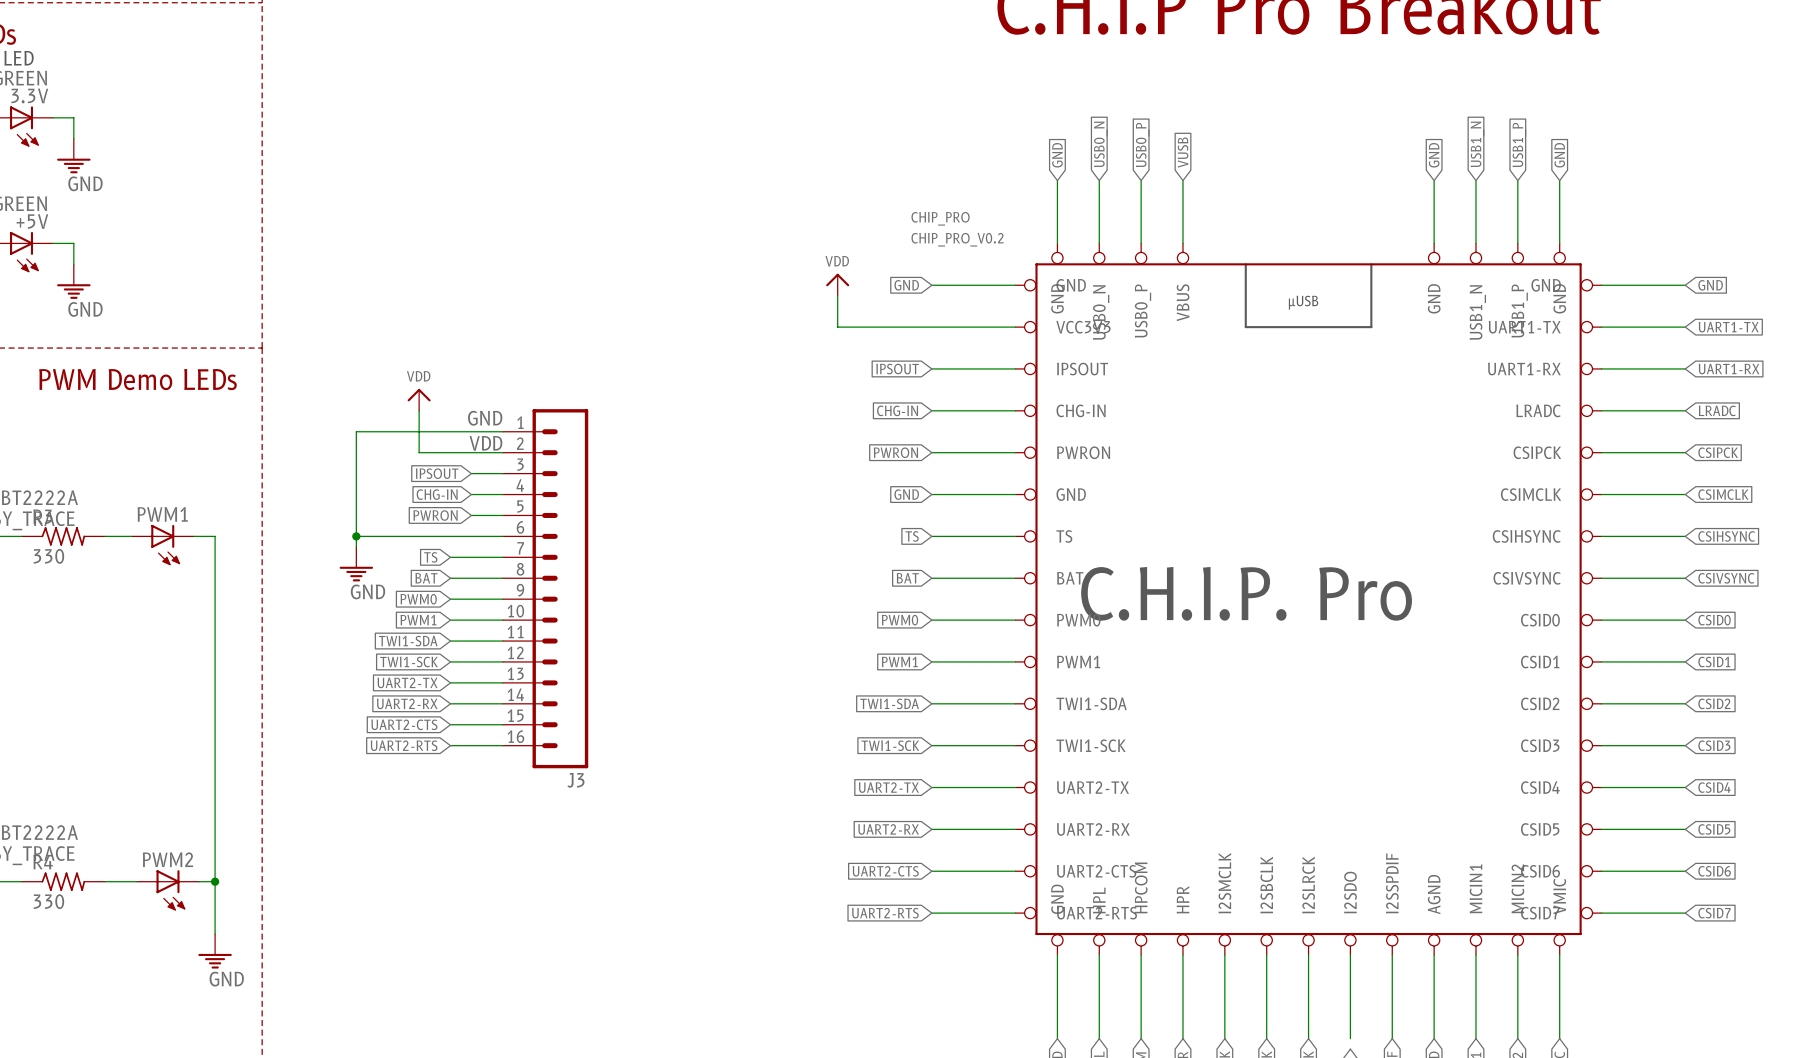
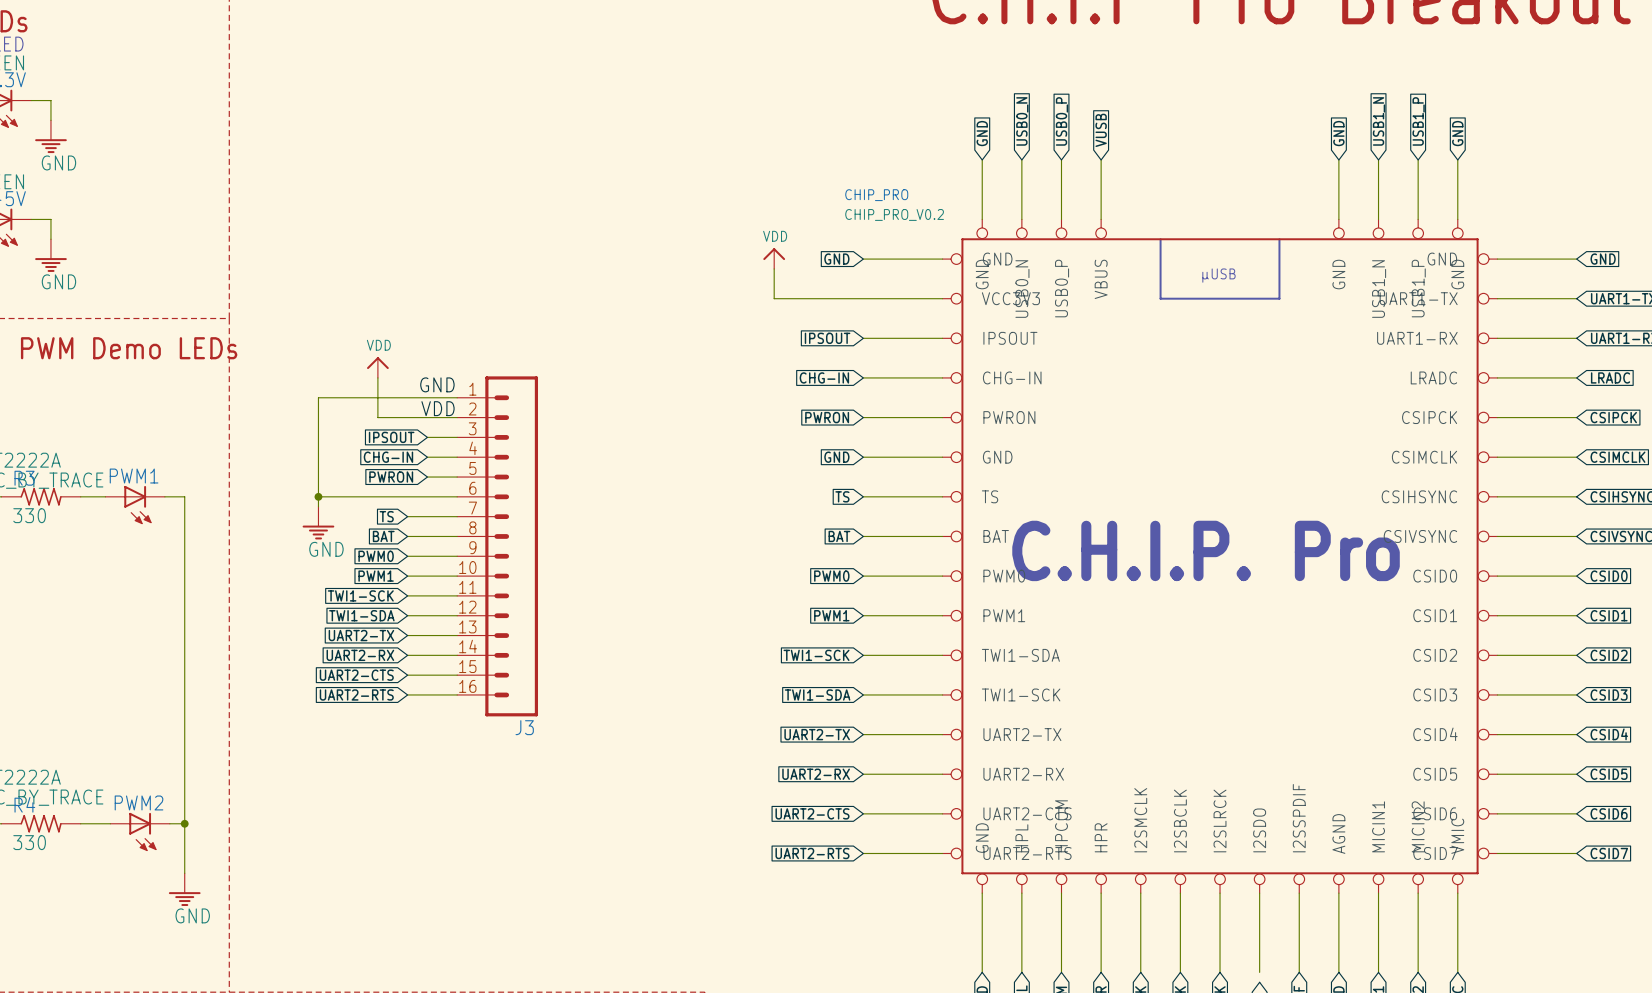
global label: TWI1-SDA (408, 641) -> TWI1-SCK (360, 595)
global label: TWI1-SCK (409, 662) -> TWI1-SDA (361, 615)
global label: TWI1-SDA (889, 703) -> TWI1-SCK (816, 655)
global label: TWI1-SCK (890, 745) -> TWI1-SDA (817, 694)

